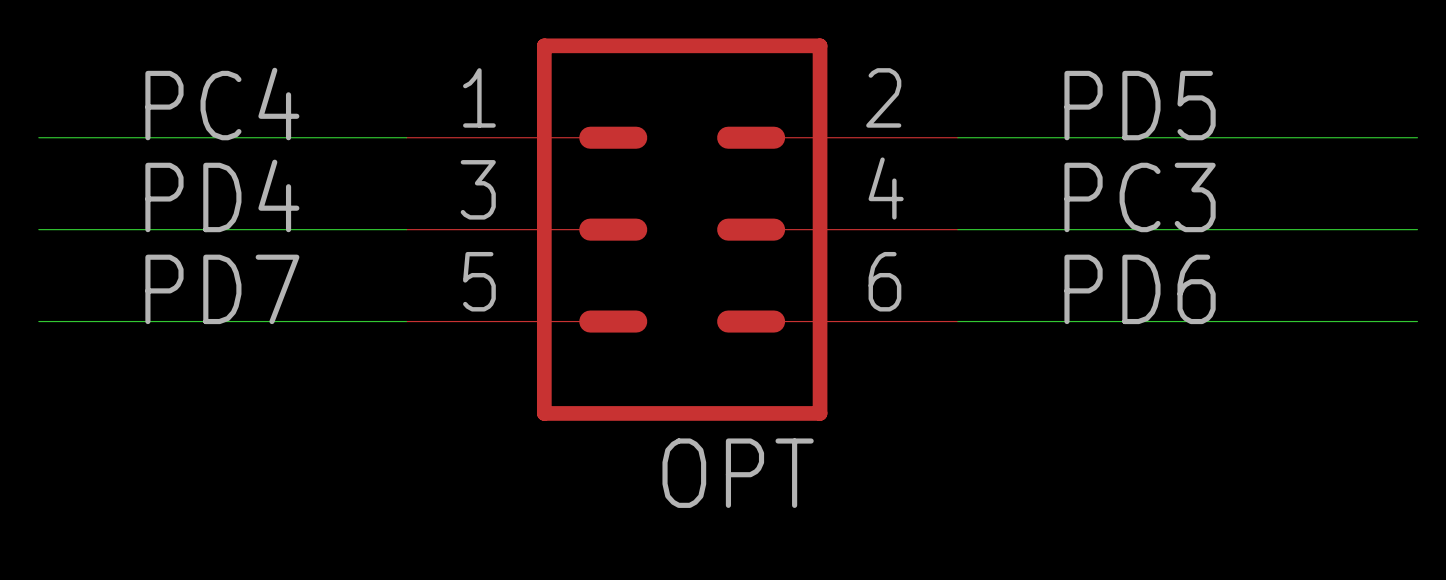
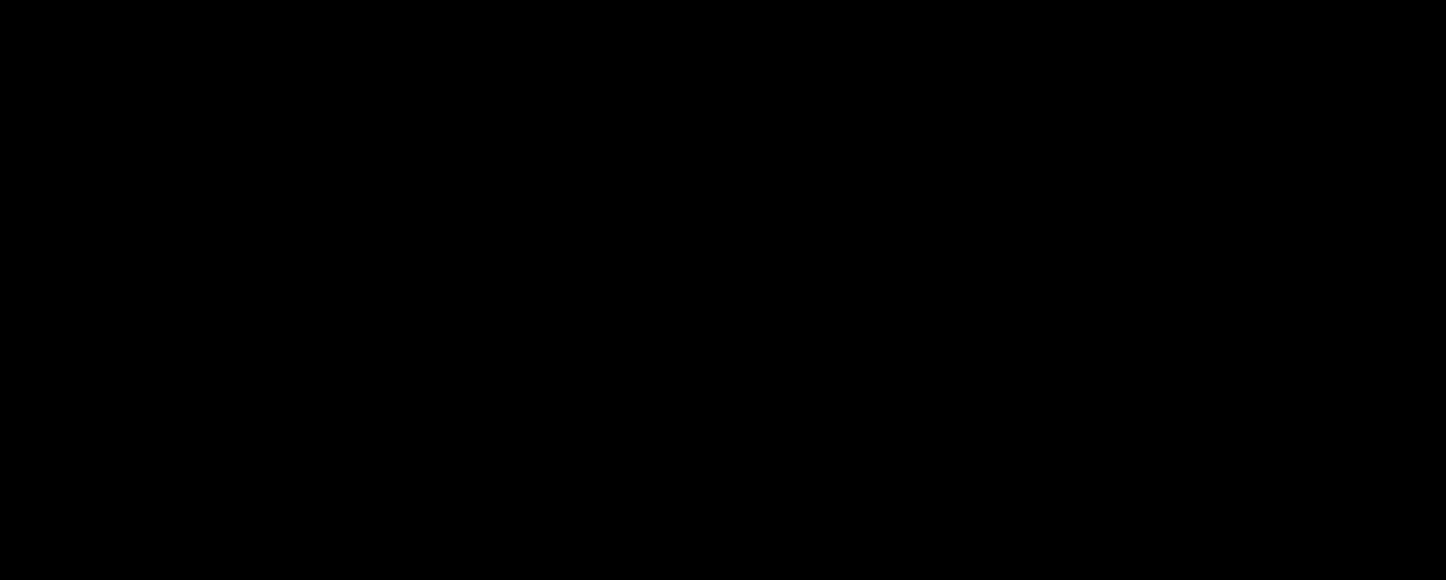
label: PC4 (222, 104) -> none
label: PD5 (1140, 105) -> none
wire: (38, 137) (406, 137) -> none
wire: (957, 137) (1417, 137) -> none
label: PD4 (222, 195) -> none
label: PC3 (1140, 197) -> none
wire: (38, 229) (406, 229) -> none
OPT: (682, 229) -> none
wire: (957, 229) (1417, 229) -> none
label: PD7 (222, 289) -> none
label: PD6 (1140, 289) -> none
wire: (38, 321) (406, 321) -> none
wire: (957, 321) (1417, 321) -> none

